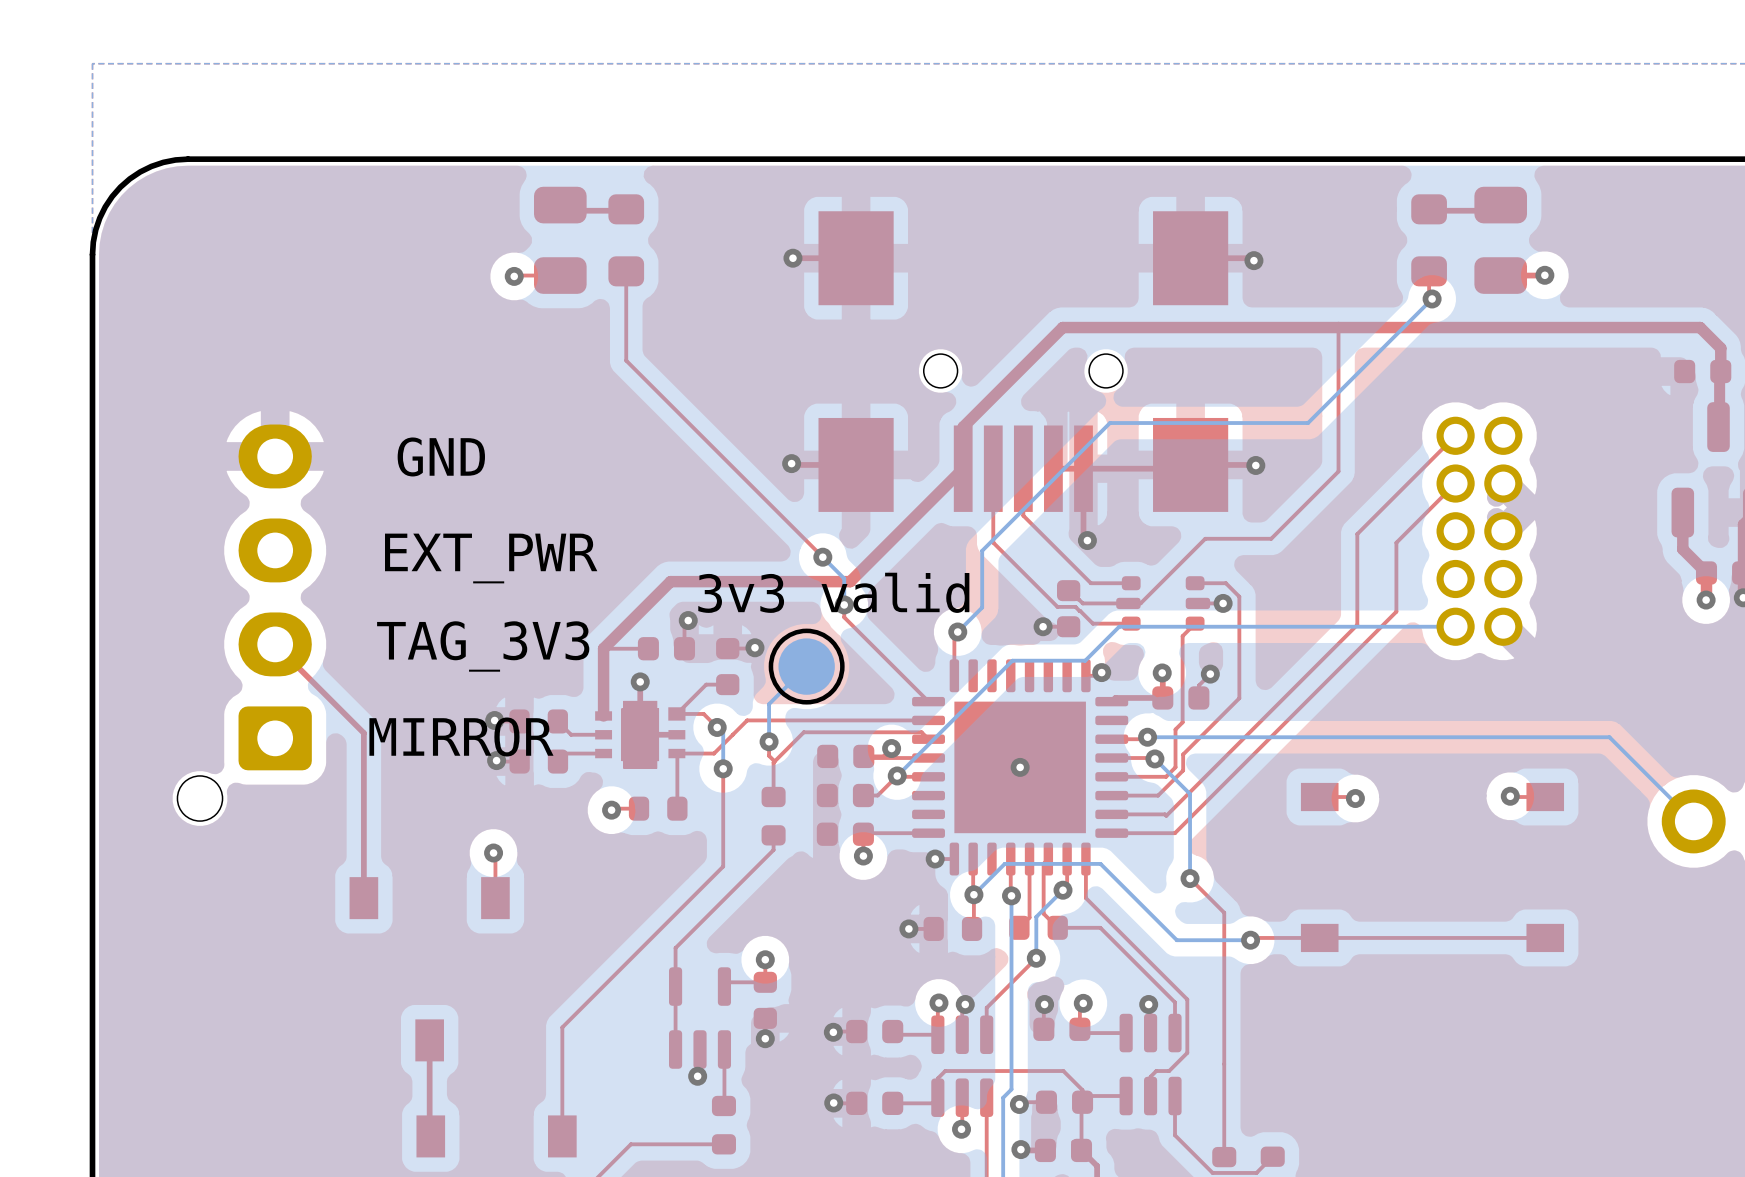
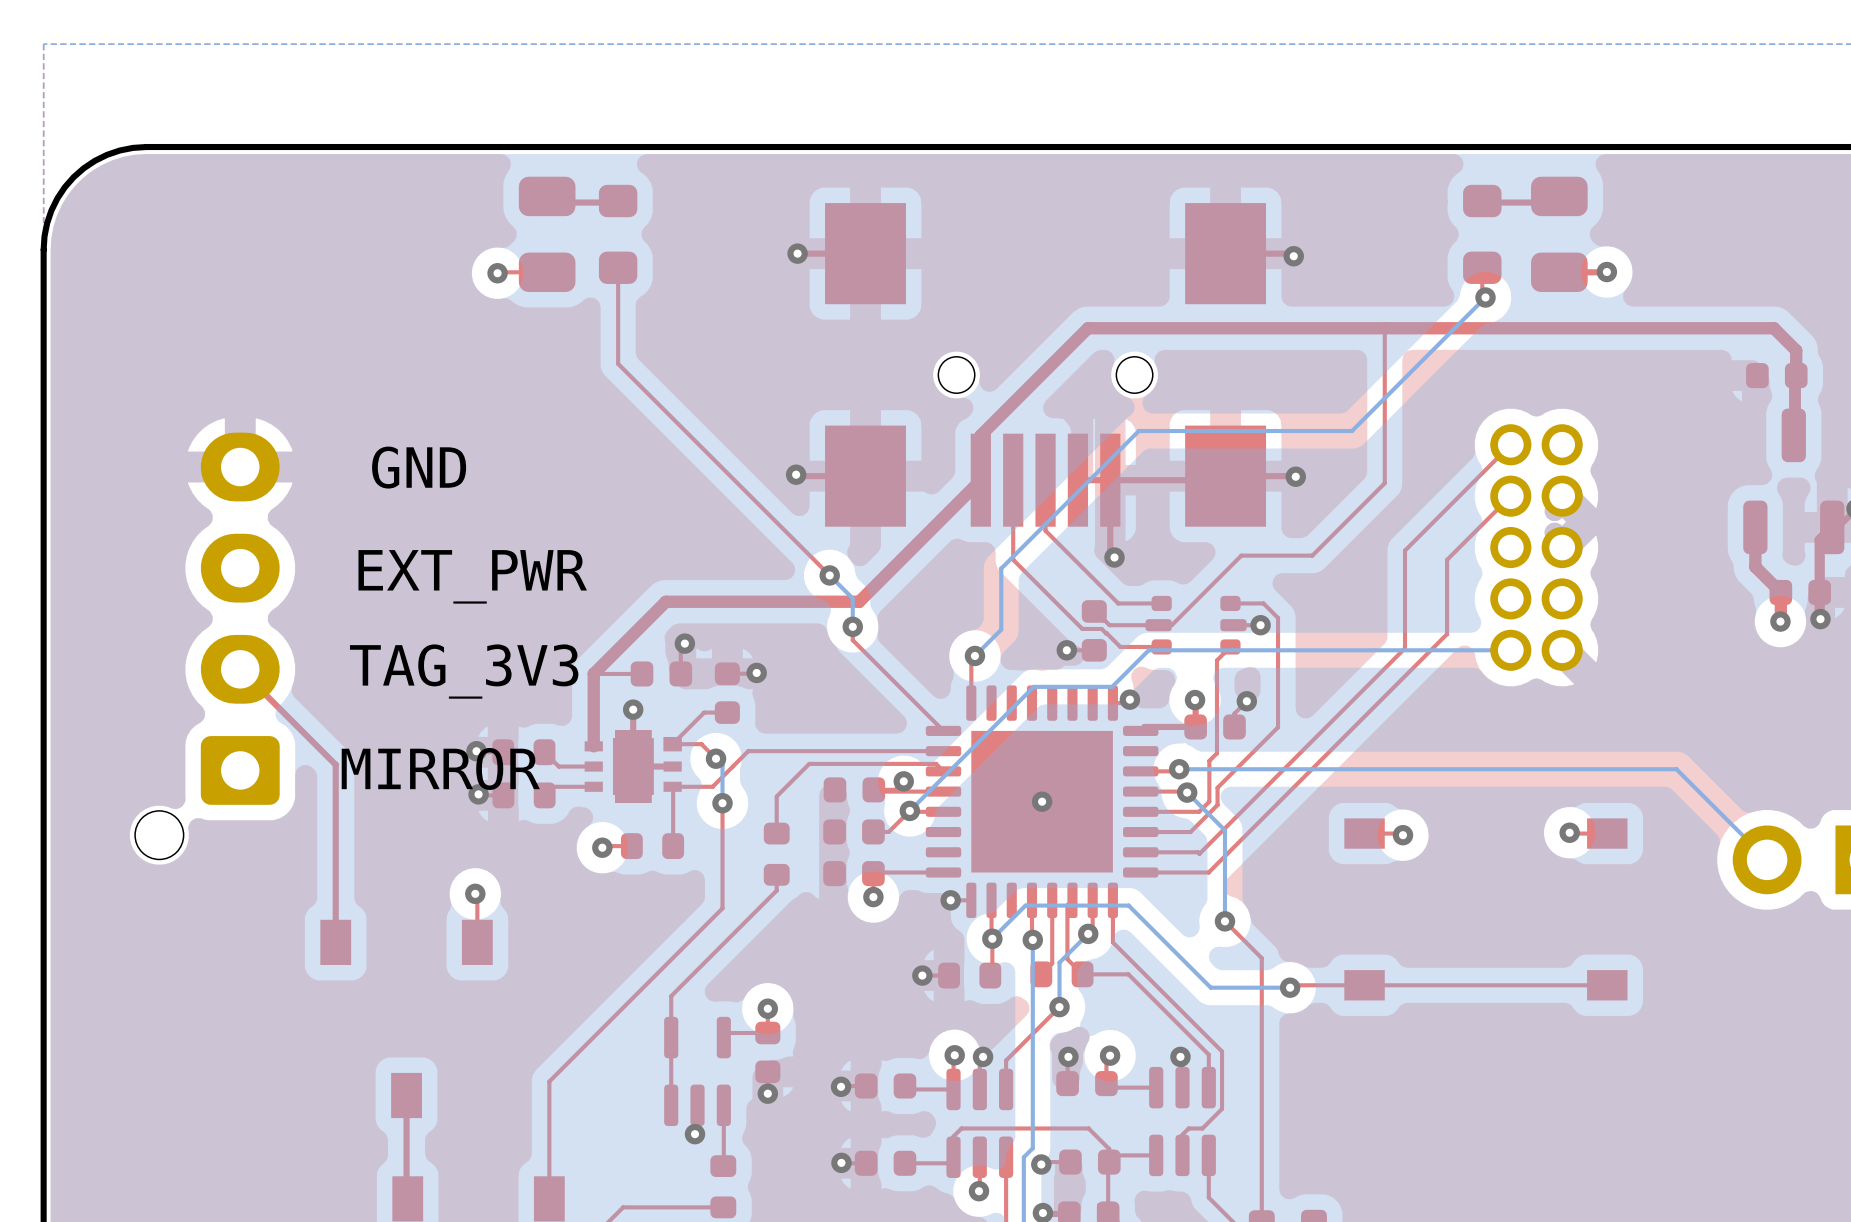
text: 3v3 valid (833, 592) -> none
bottom track: (806, 666) (769, 704) (769, 741) -> none
part: (806, 666) -> none
top track: (769, 741) (769, 755) (774, 761) -> none
via: (769, 741) -> none

